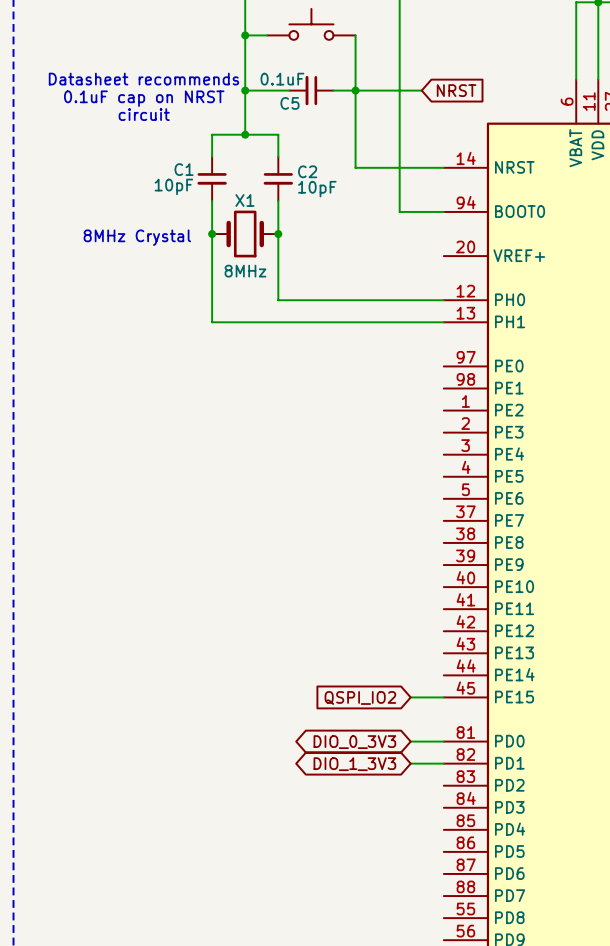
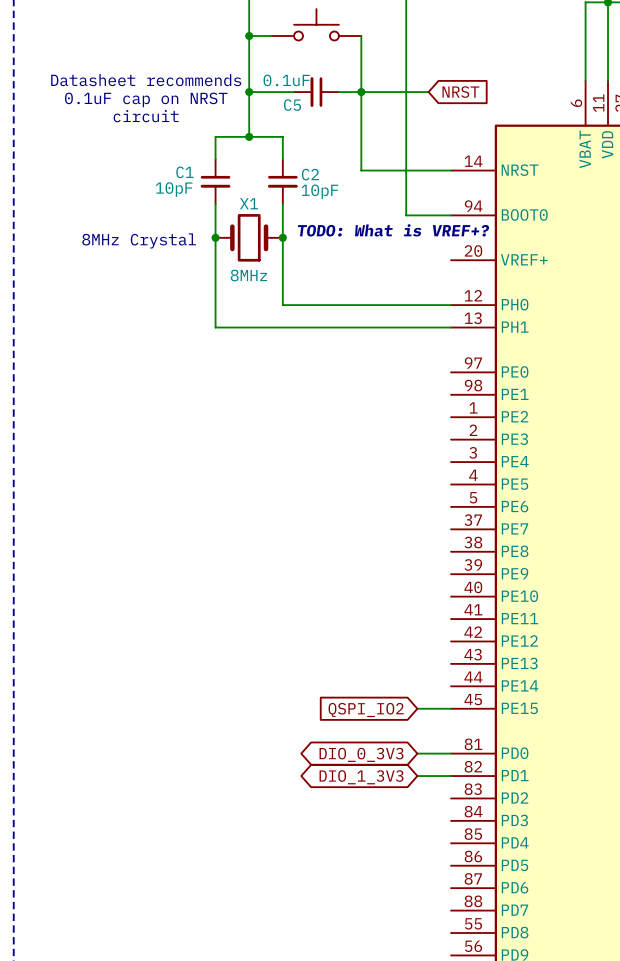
text: none -> TODO: What is VREF+? (393, 230)

